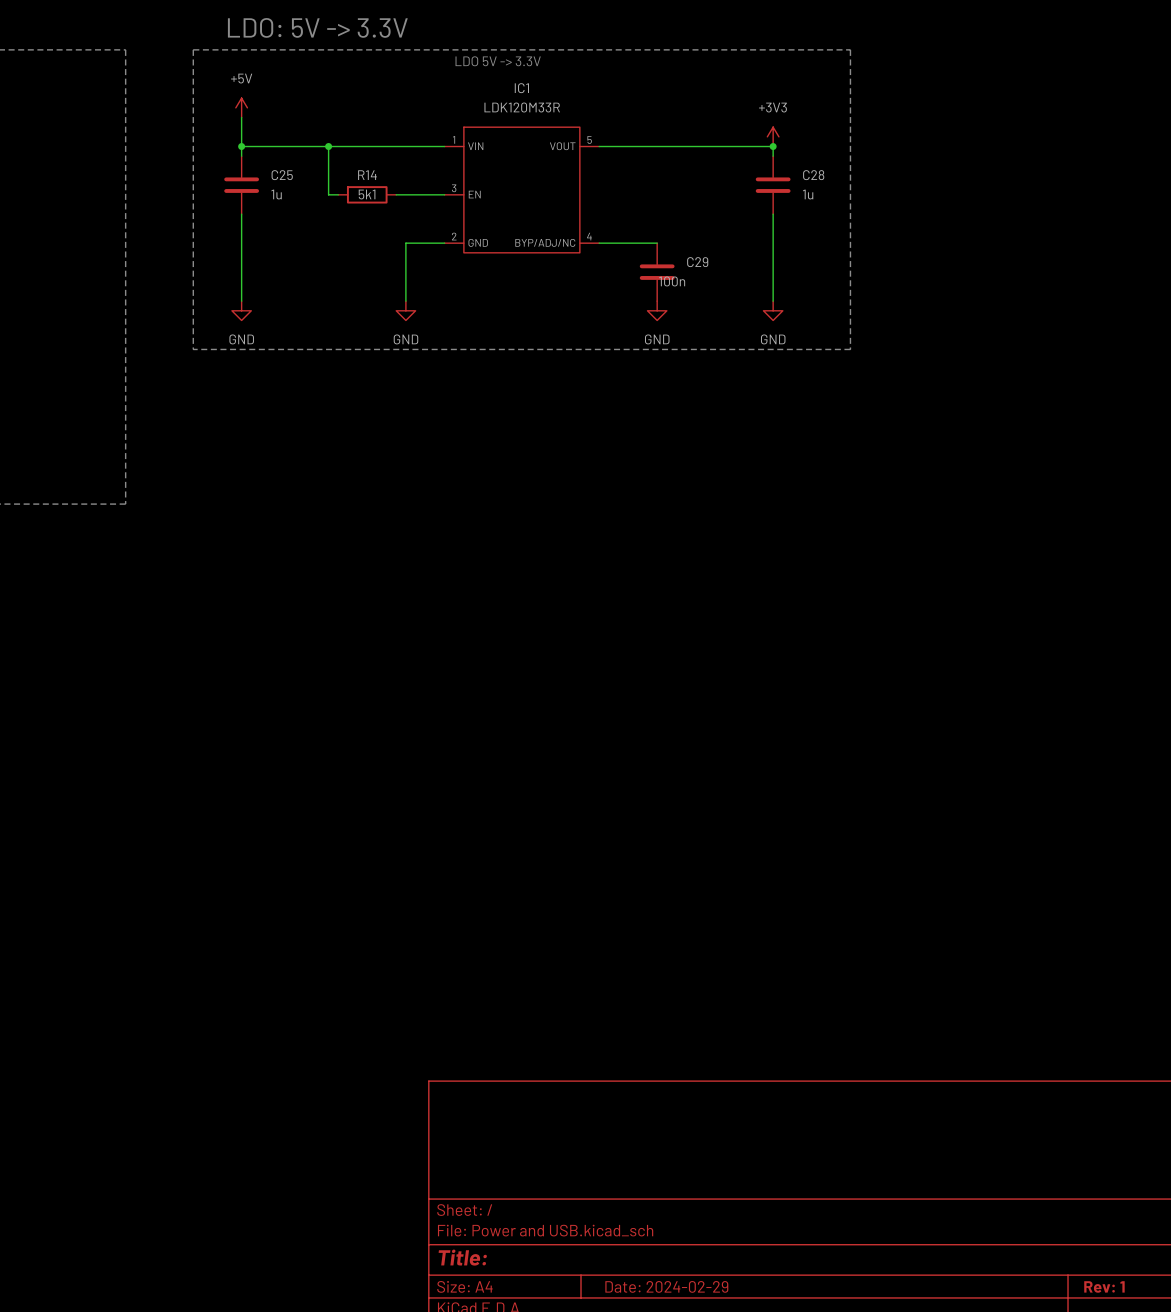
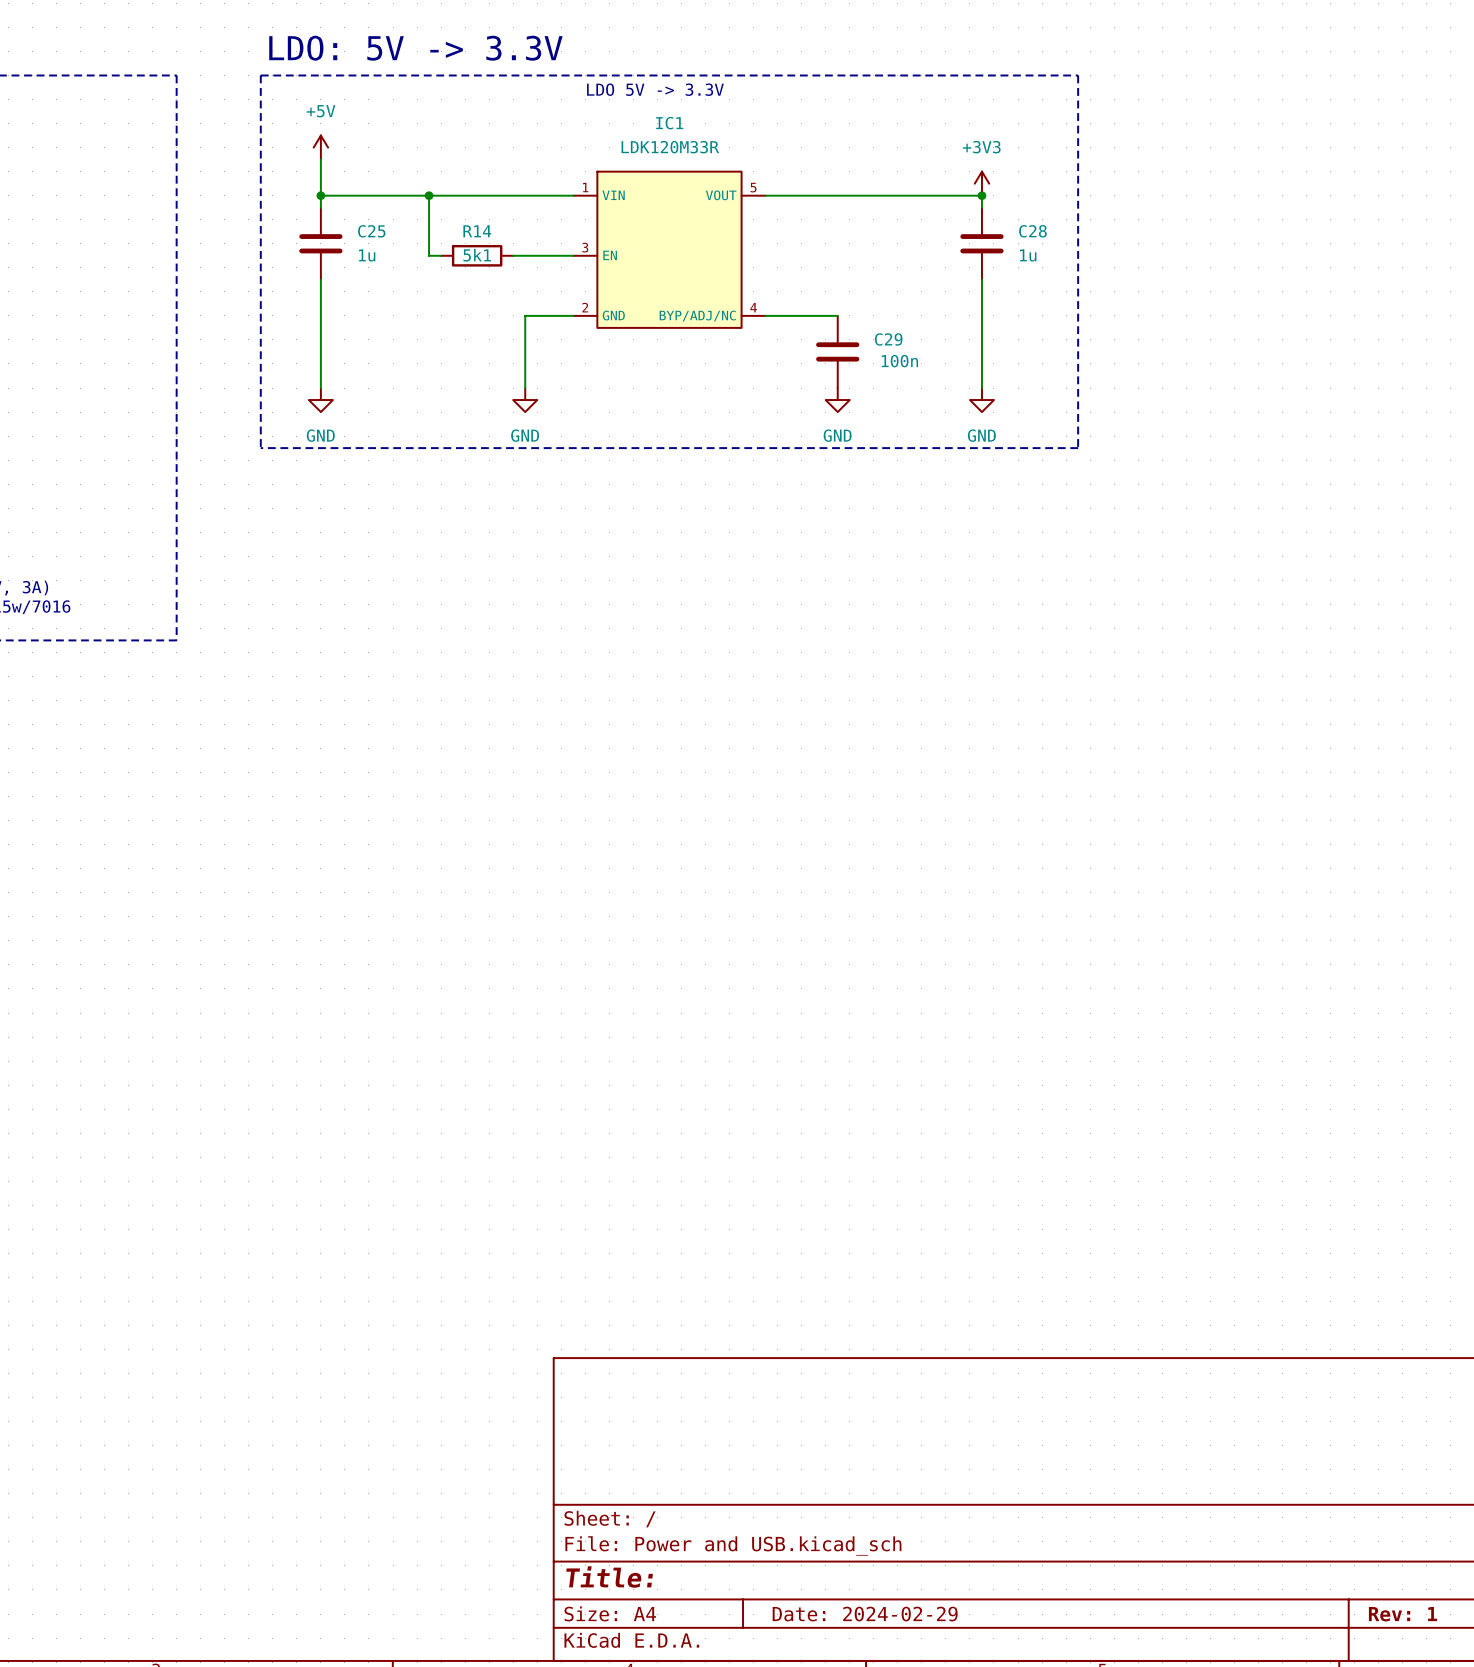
C29 value position: 100n (672, 281) -> 100n (899, 361)

